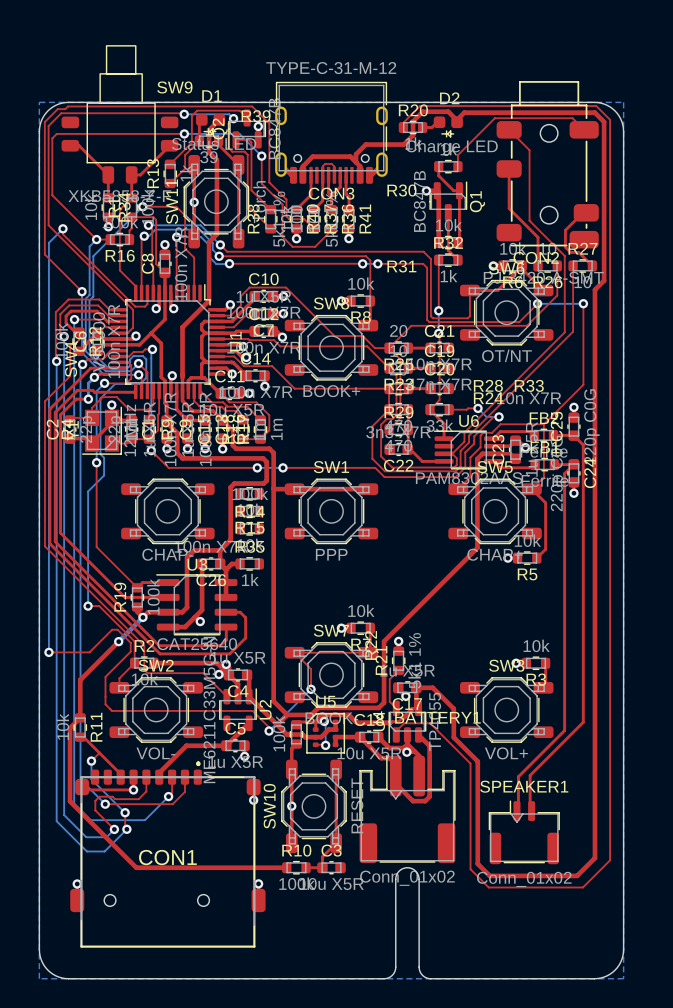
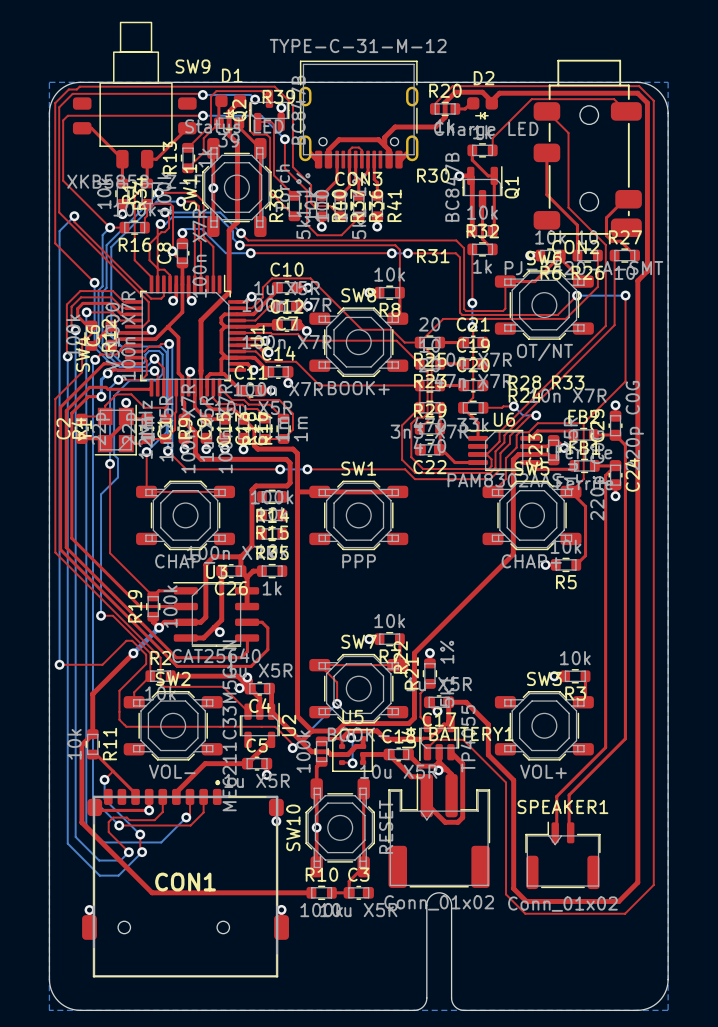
top track: none -> (181, 201) (194, 201) (198, 206) (201, 284)
bottom track: none -> (181, 201) (156, 201) (111, 247) (111, 336) (121, 346) (160, 346) (166, 352) (166, 432) (146, 452)
via: none -> (181, 201)
top track: (148, 225) (152, 228) (153, 284) -> (165, 212) (169, 216) (169, 227) (164, 232) (161, 232) (149, 244) (149, 260) (158, 269) (164, 269) (170, 275)
bottom track: (176, 237) (201, 237) (209, 245) (209, 256) (216, 264) (229, 263) -> (183, 228) (201, 228) (225, 253) (250, 253)
via: (176, 237) -> none
via: none -> (172, 251)
bottom track: none -> (172, 344) (172, 457)
top track: none -> (146, 452) (146, 491)
via: none -> (146, 452)
top track: none -> (146, 491) (224, 491)

